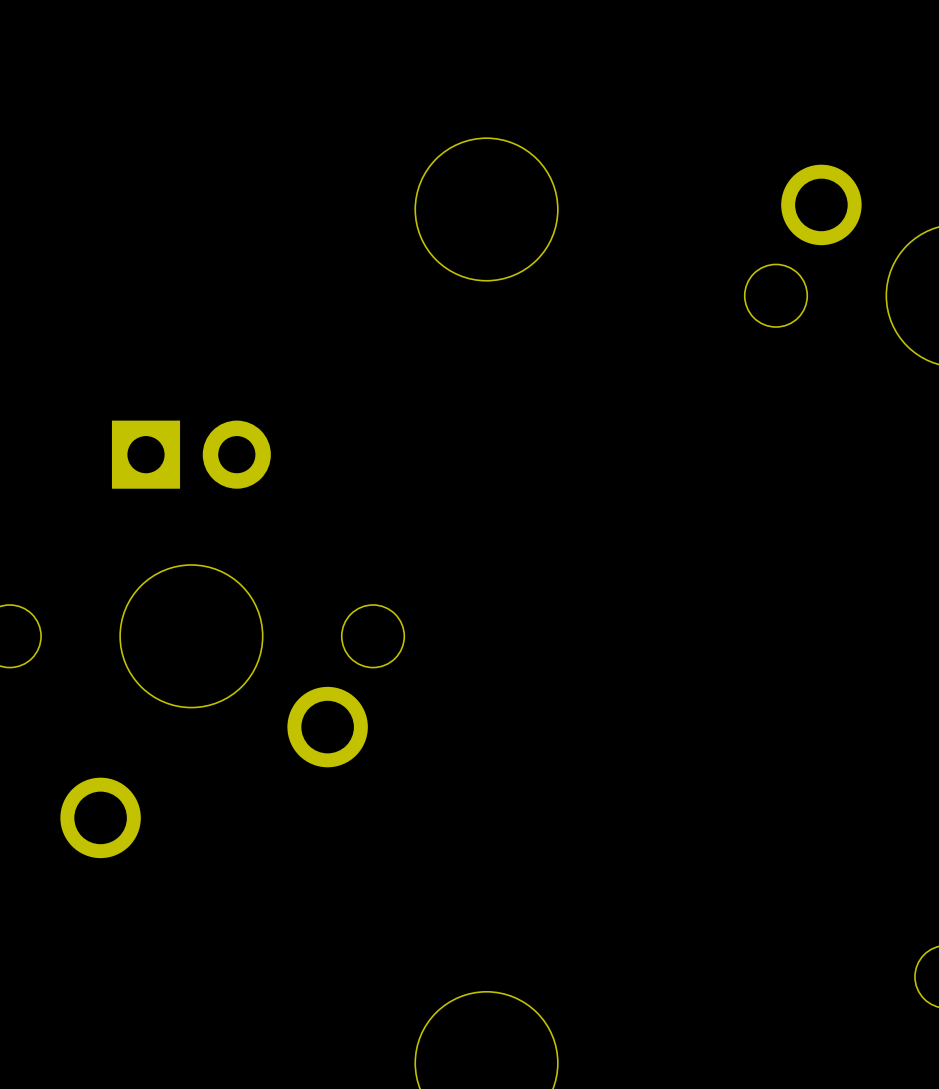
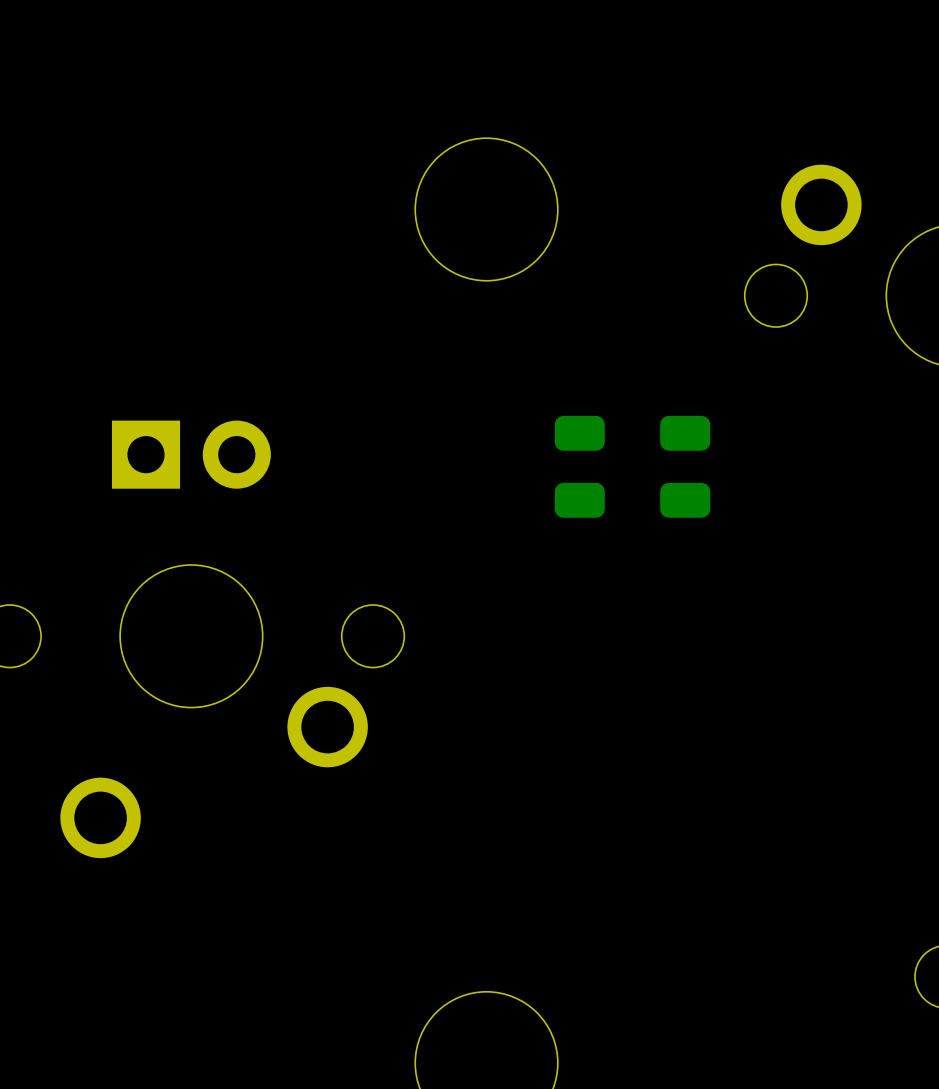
part: none -> (579, 466)
part: none -> (685, 466)

